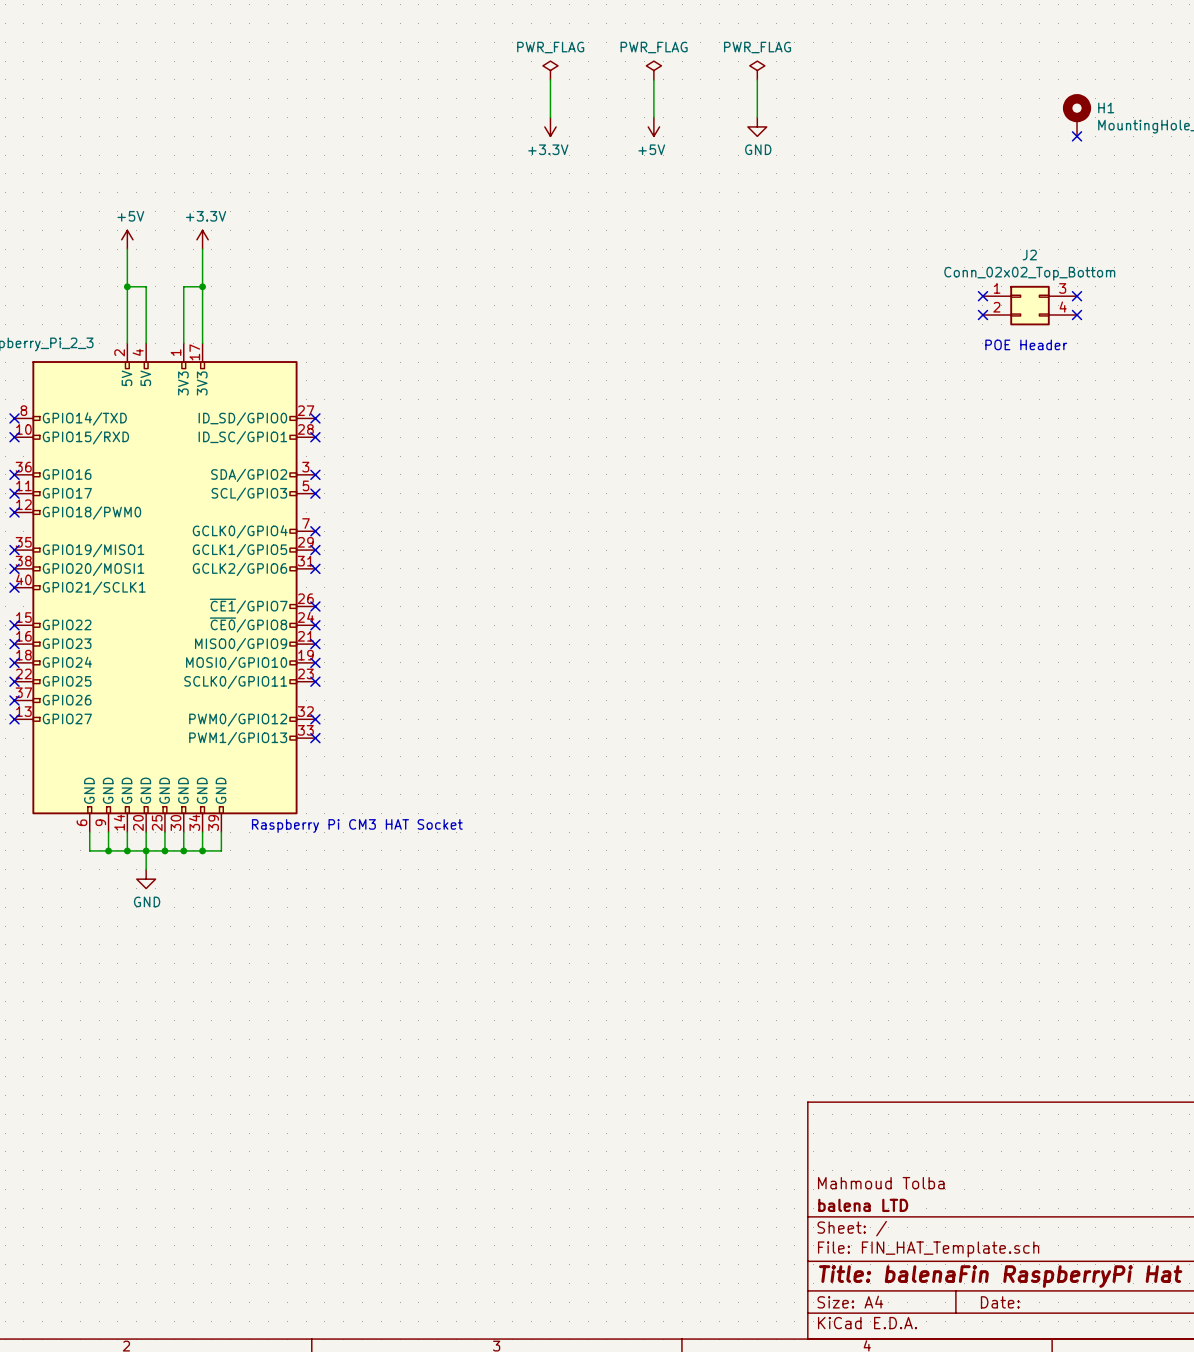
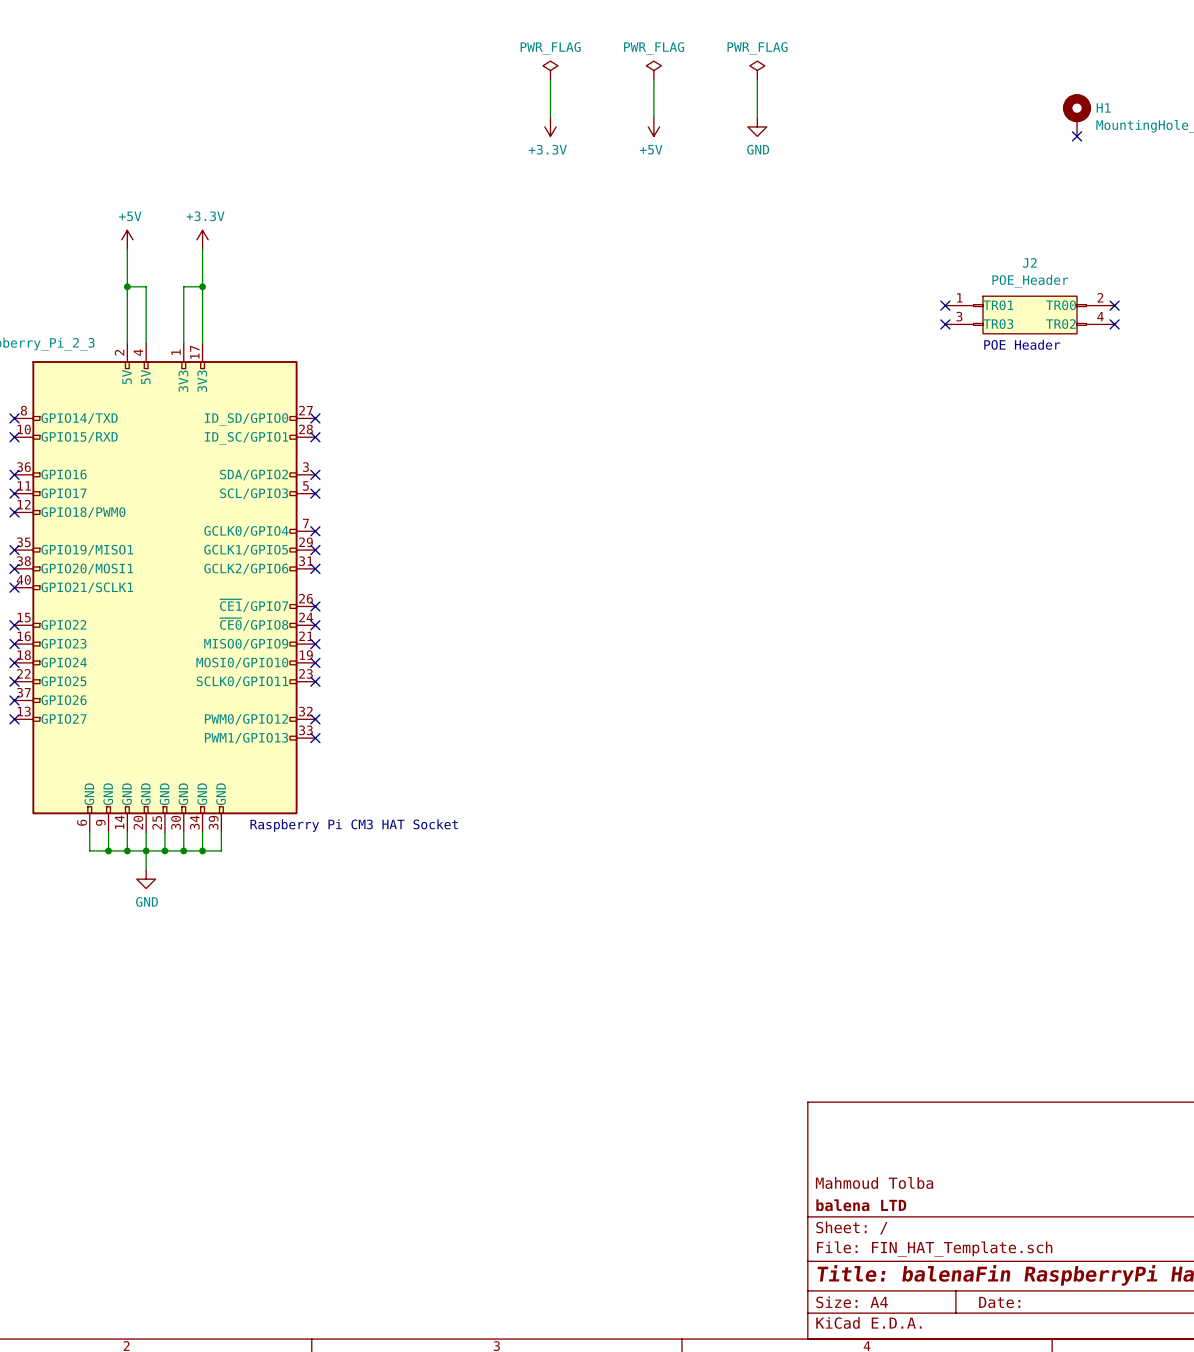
J2 value: Conn_02x02_Top_Bottom (1029, 273) -> POE_Header (1030, 281)
J2 symbol: [982, 285, 1078, 326] -> [945, 296, 1115, 334]
no-connect mark: (982, 296) -> none
no-connect mark: (1077, 296) -> none
no-connect mark: none -> (945, 305)
no-connect mark: none -> (1114, 305)
no-connect mark: (982, 315) -> none
no-connect mark: (1077, 315) -> none
no-connect mark: none -> (945, 324)
no-connect mark: none -> (1114, 324)

